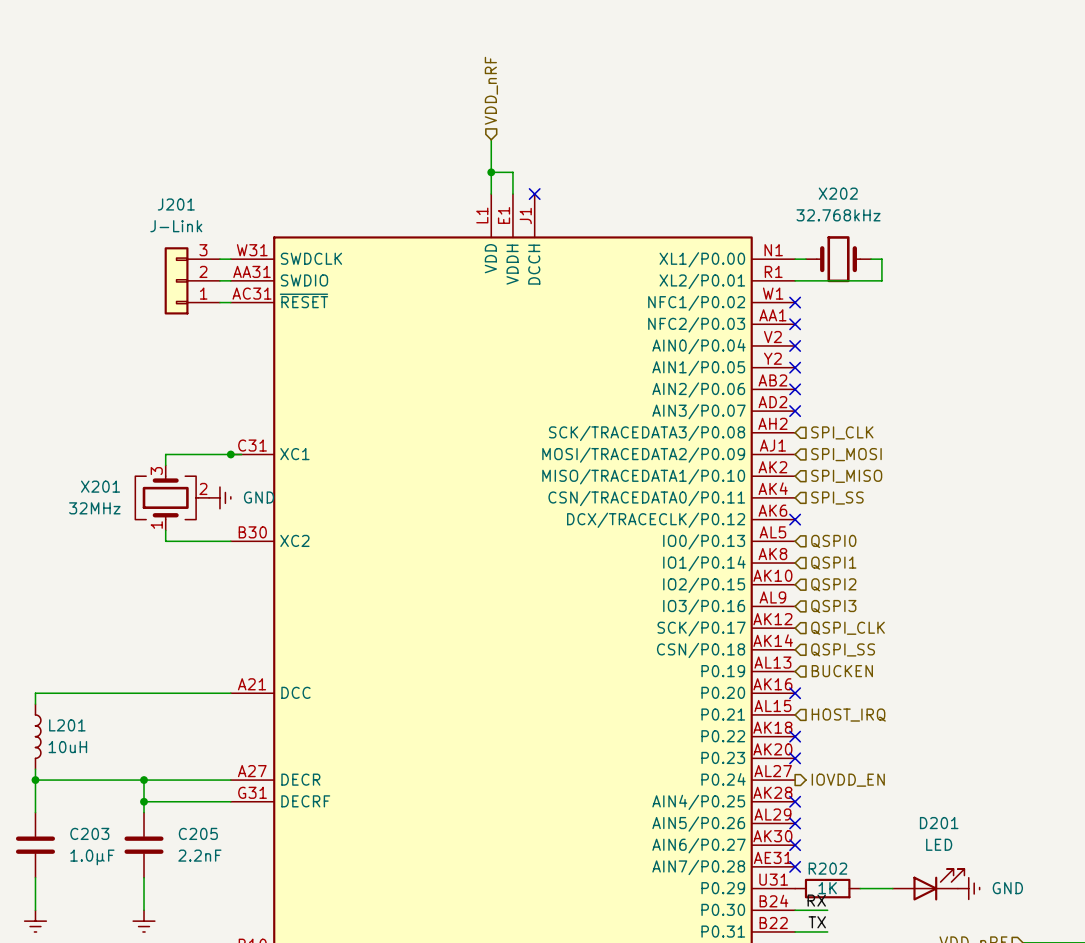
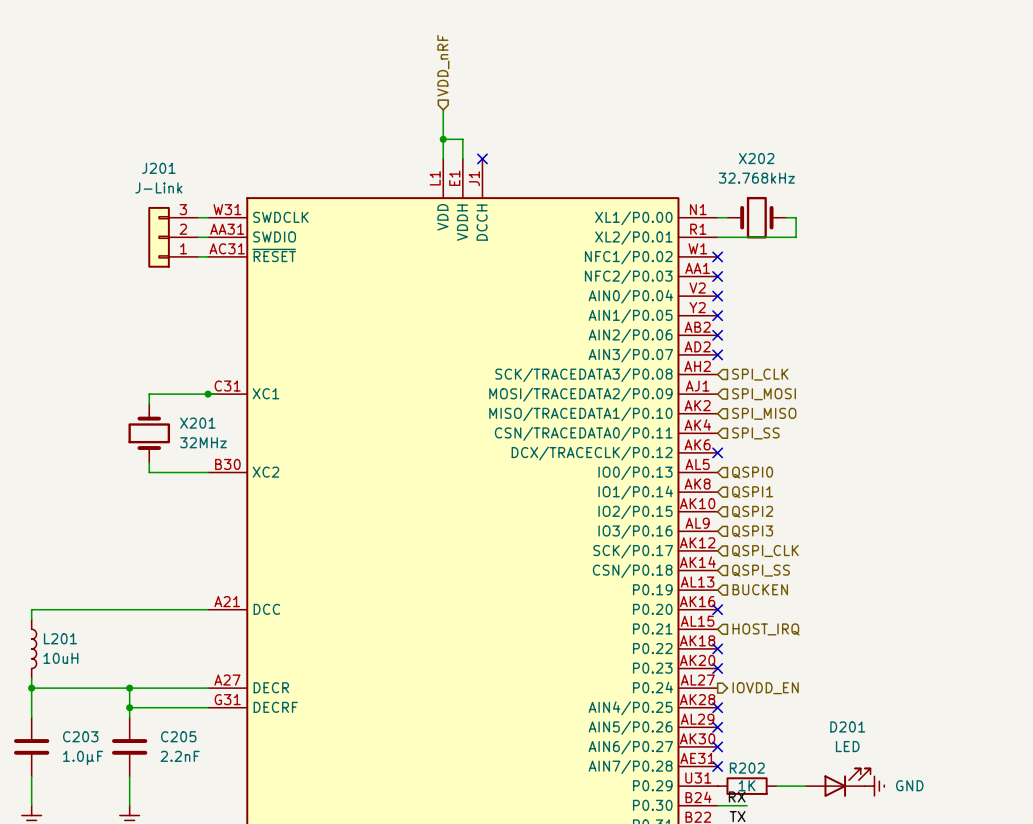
X201 symbol: [135, 465, 210, 531] -> [128, 403, 171, 463]
X201 name position: X201 (100, 486) -> X201 (197, 423)
power symbol: GND (219, 497) -> none
X201 value position: 32MHz (94, 508) -> 32MHz (203, 442)

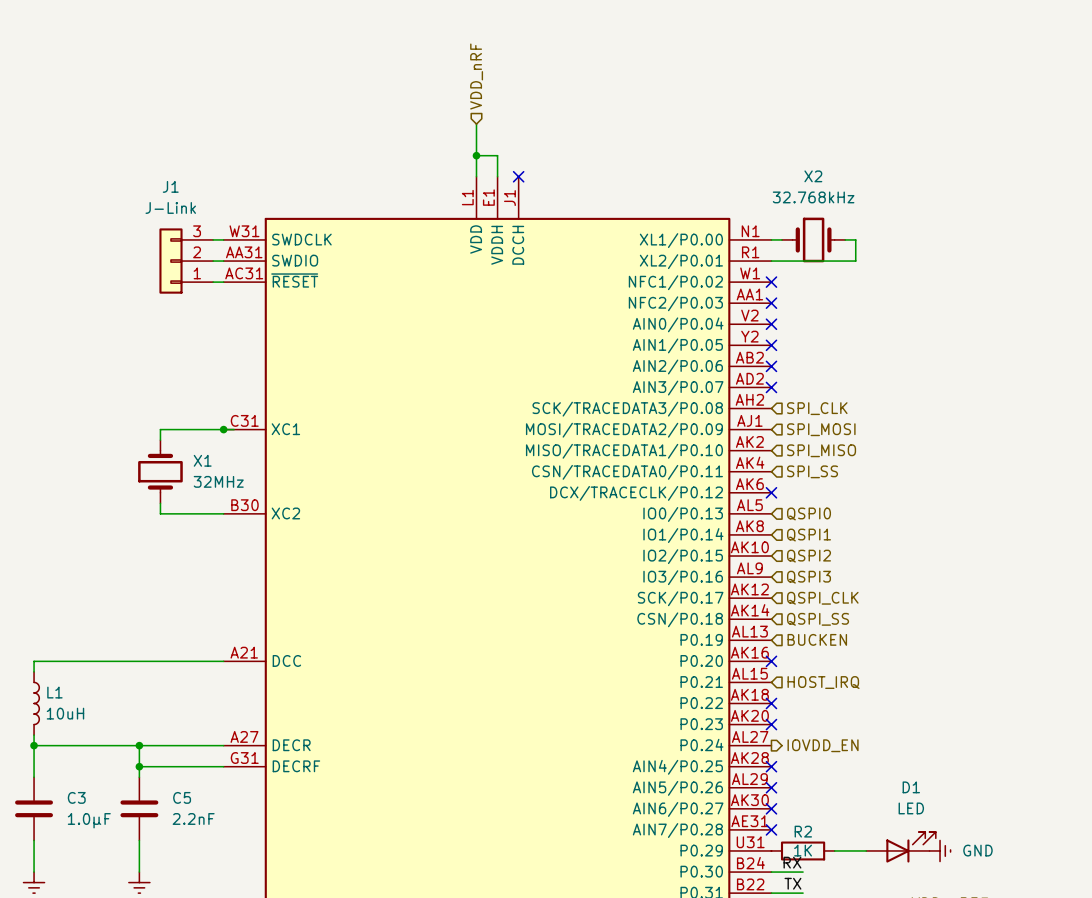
X202 name: X202 (756, 158) -> X2 (813, 176)
J201 name: J201 (158, 168) -> J1 (170, 186)
X201 name: X201 (197, 423) -> X1 (202, 460)
L201 name: L201 (60, 638) -> L1 (54, 692)
D201 name: D201 (847, 726) -> D1 (911, 787)
C203 name: C203 (80, 736) -> C3 (76, 797)
C205 name: C205 (178, 736) -> C5 (182, 797)
R202 name: R202 (747, 768) -> R2 (803, 831)

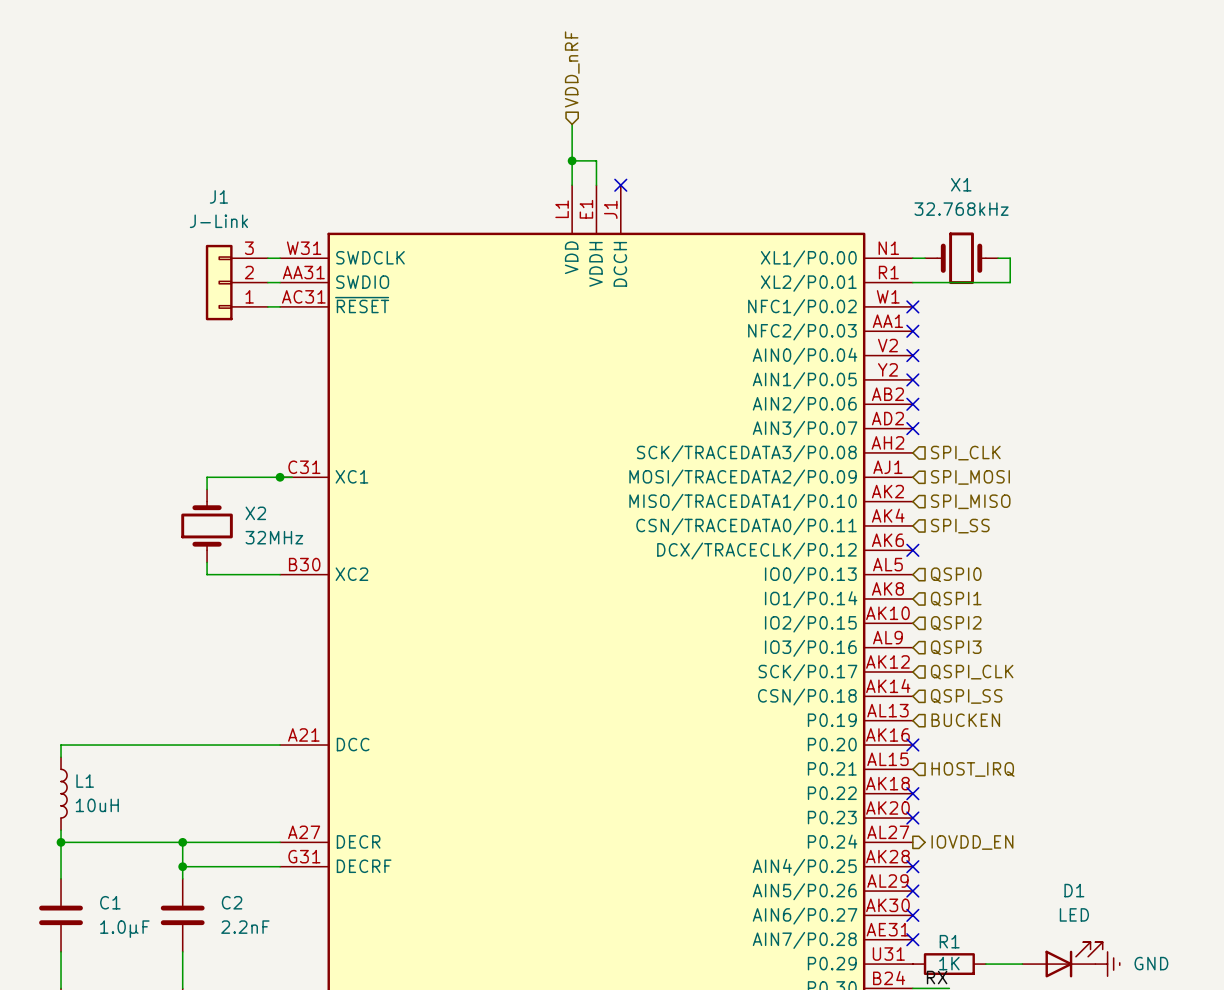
X2 name: X2 (813, 176) -> X1 (961, 184)
X1 name: X1 (202, 460) -> X2 (255, 513)
C3 name: C3 (76, 797) -> C1 (110, 902)
C5 name: C5 (182, 797) -> C2 (232, 902)
R2 name: R2 (803, 831) -> R1 (949, 941)

